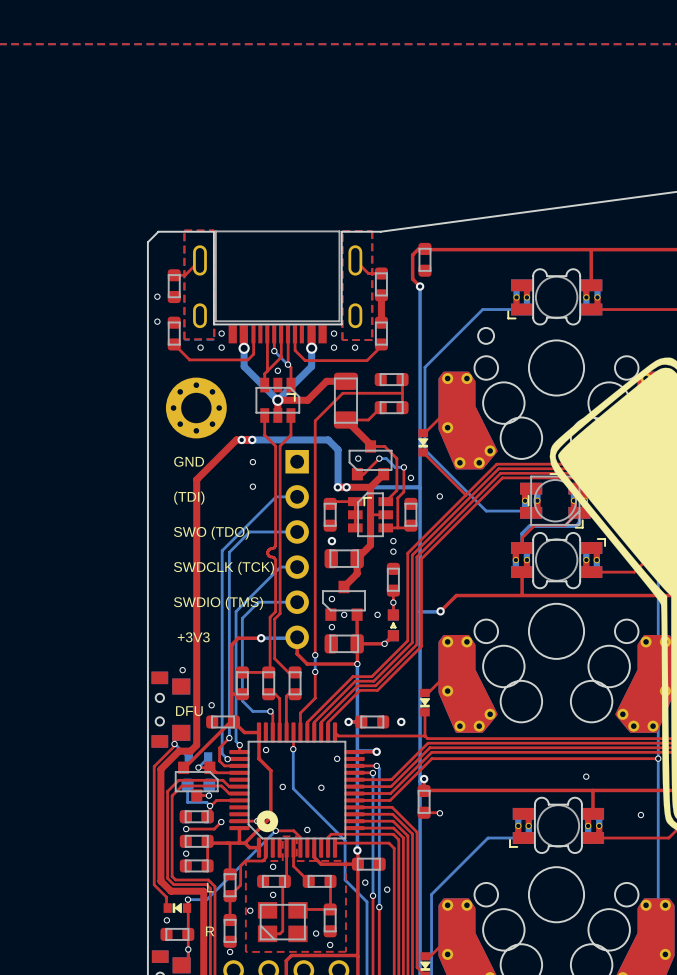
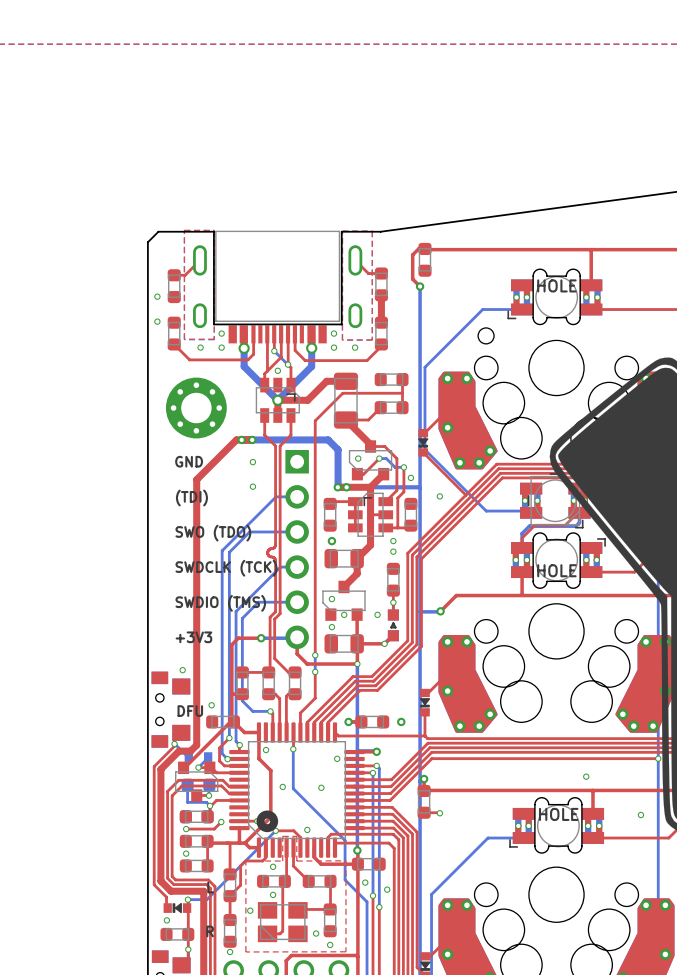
part text: none -> HOLE (556, 285)
part text: none -> HOLE (556, 570)
part text: none -> HOLE (558, 814)

